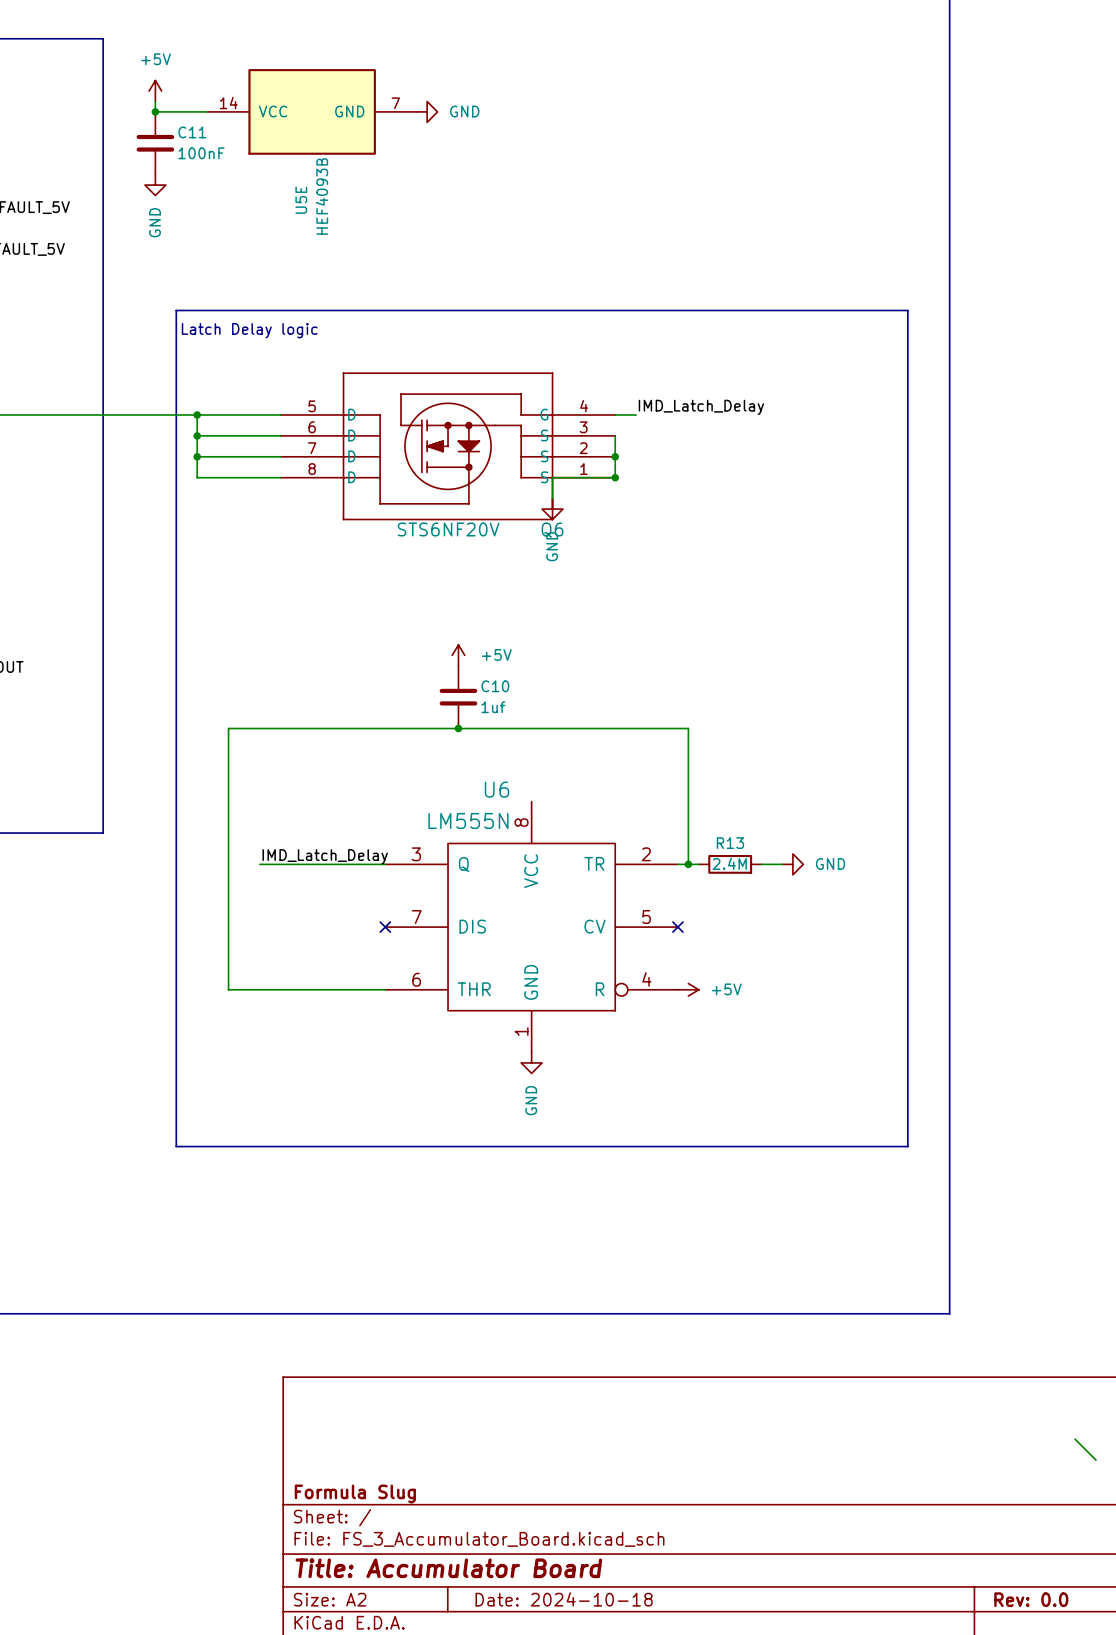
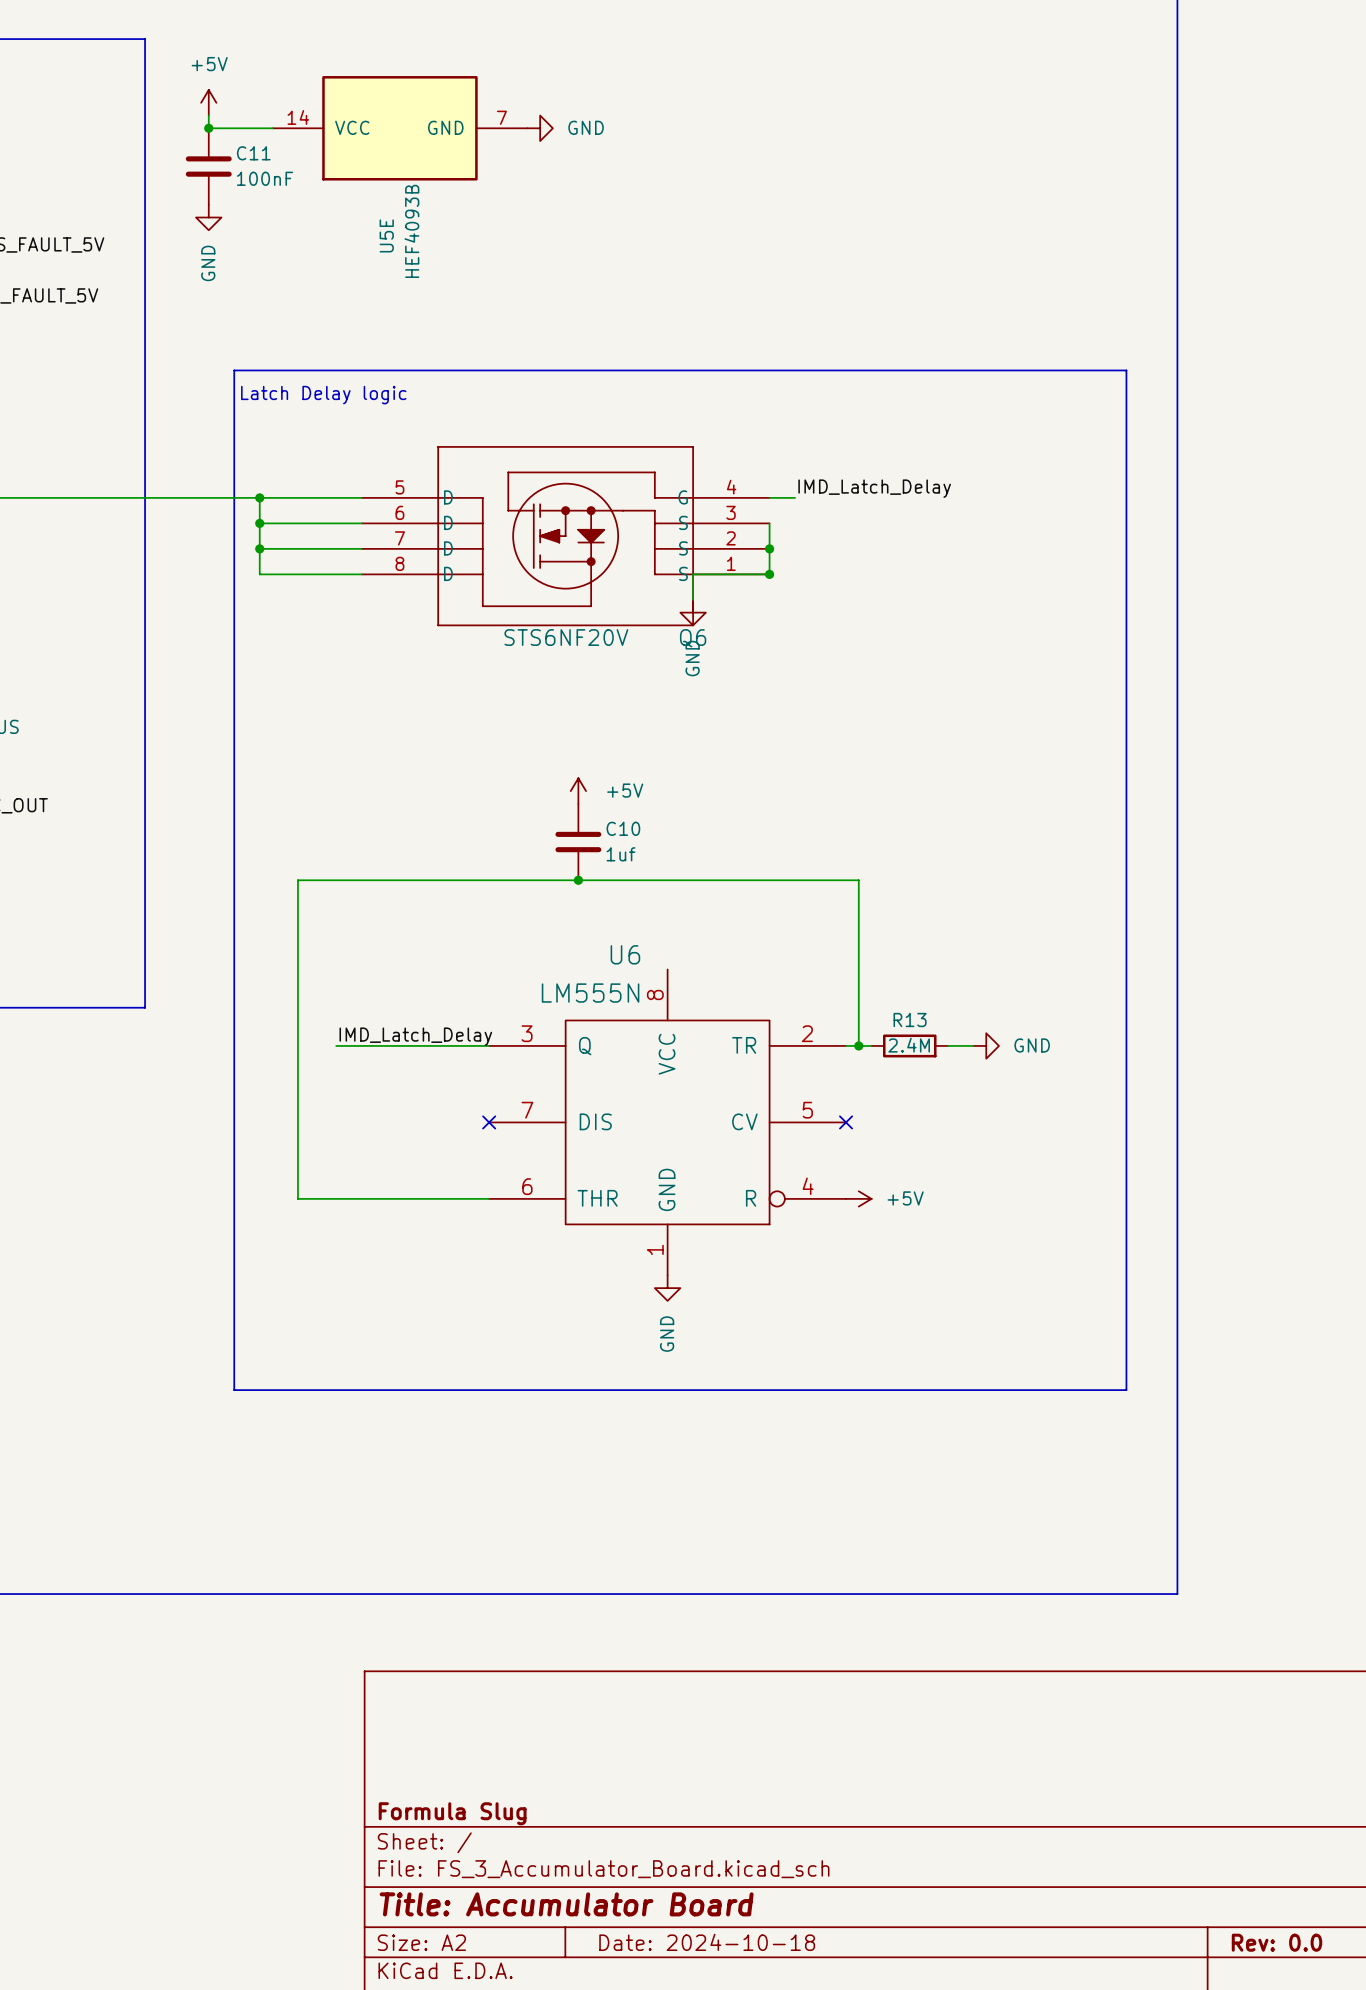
wire: (1075, 1439) (1095, 1460) -> none

